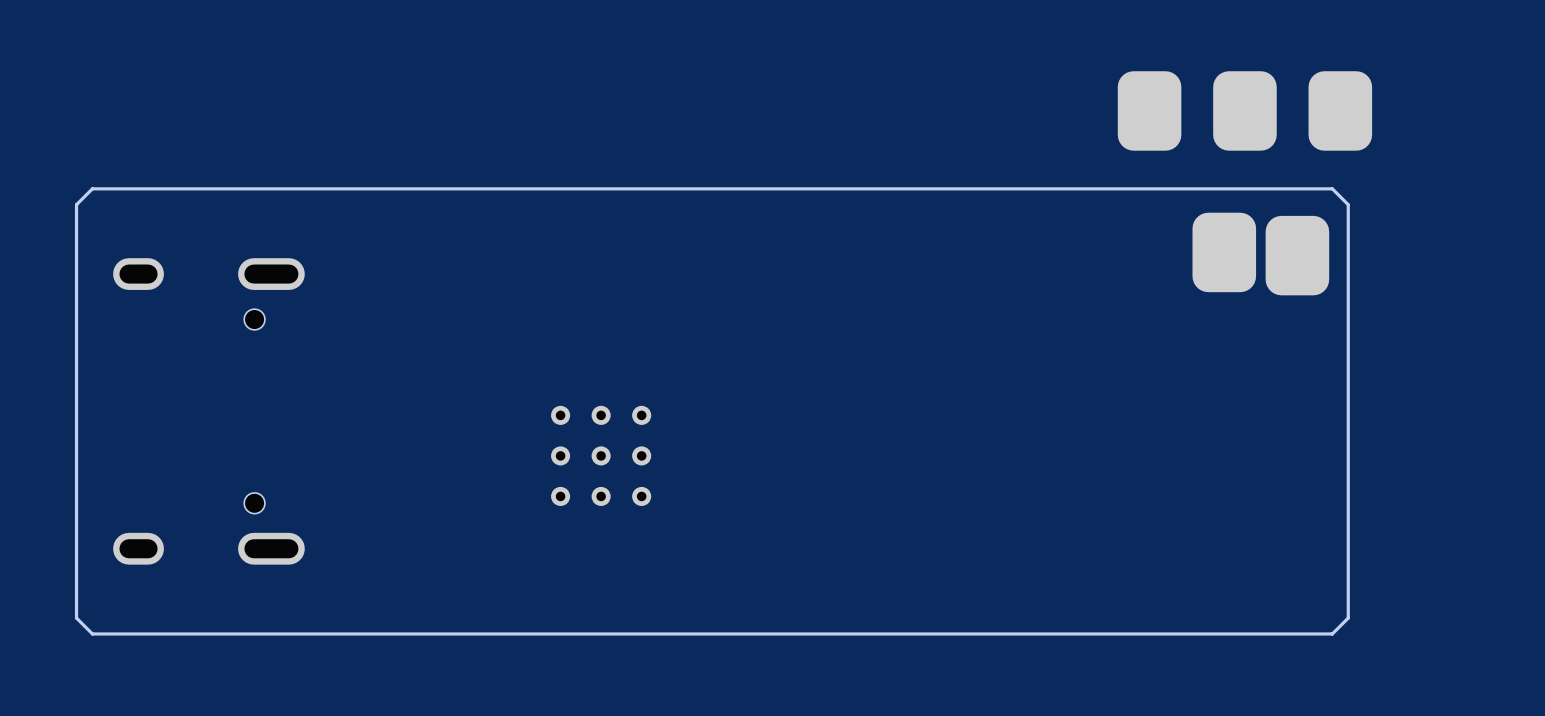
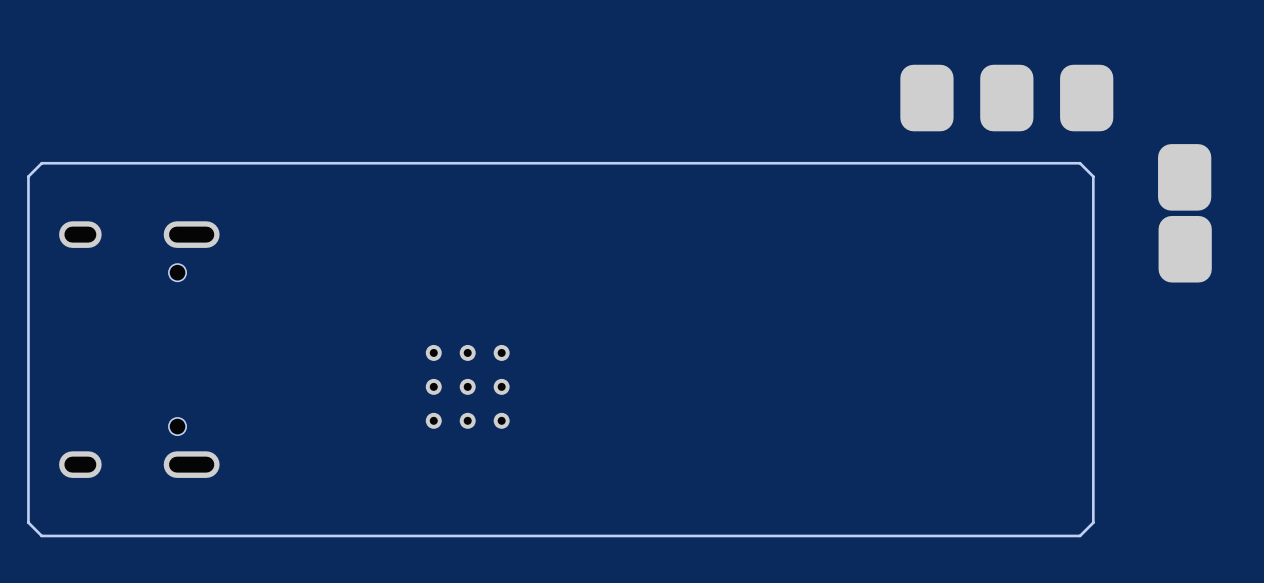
part: none -> (1184, 177)
part: (1224, 252) -> none
part: (1297, 255) -> none
part: none -> (1185, 249)

